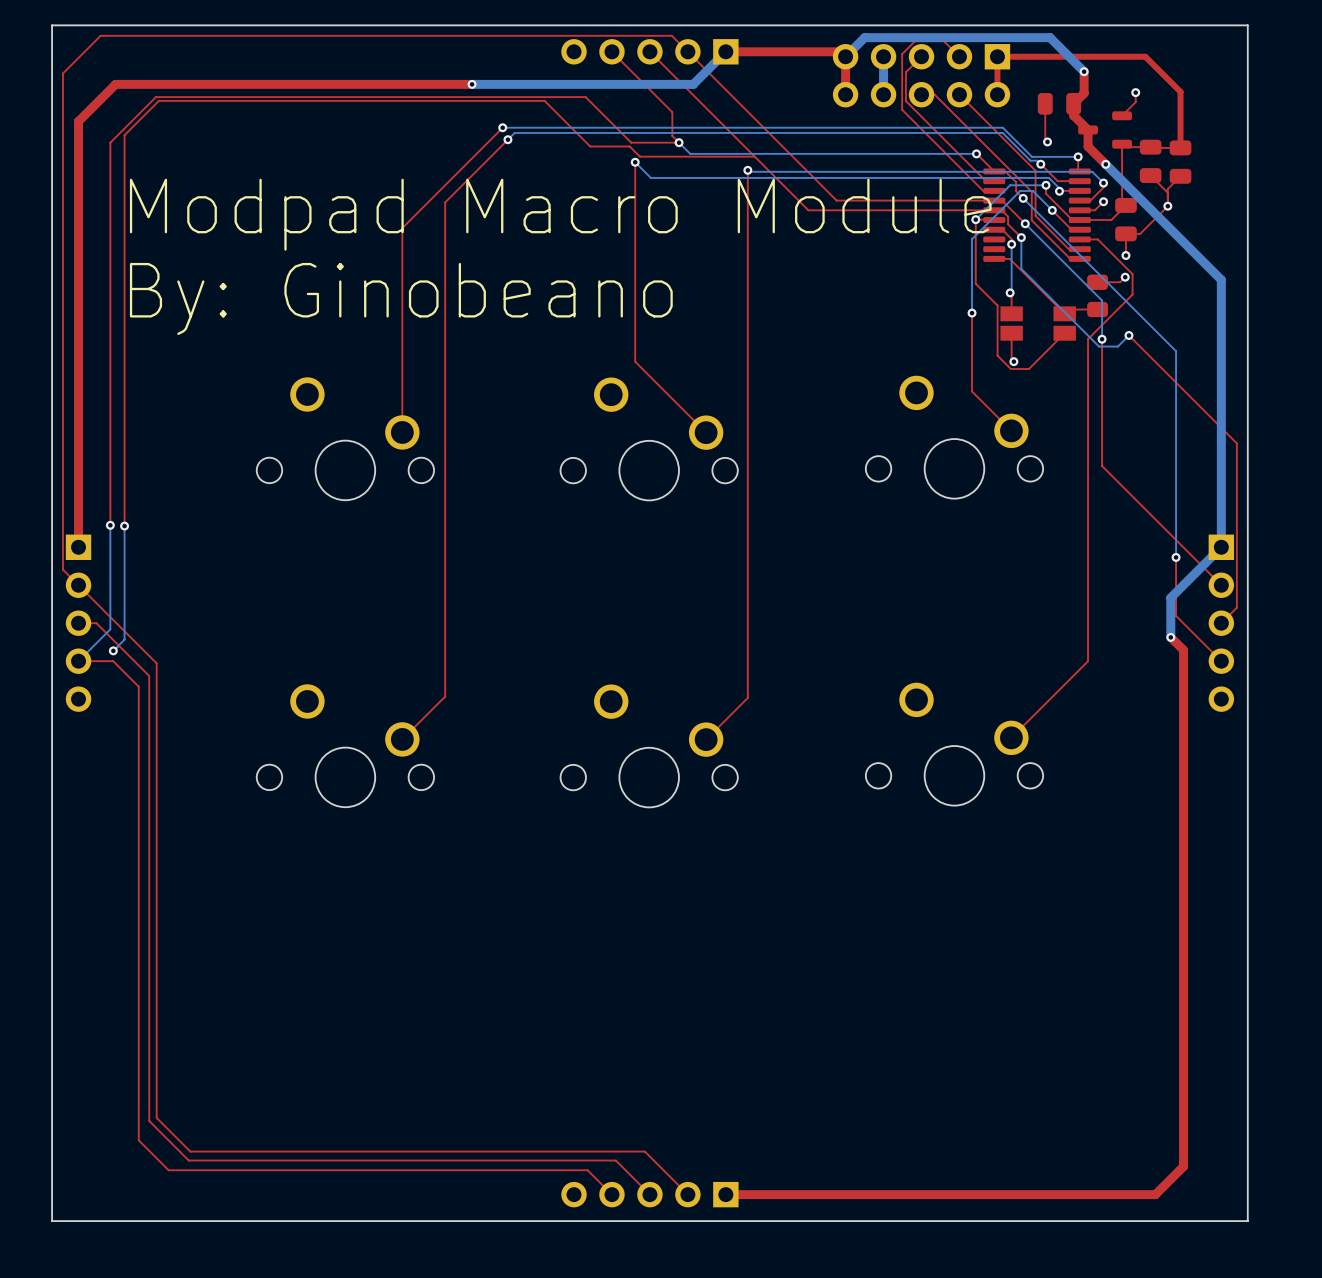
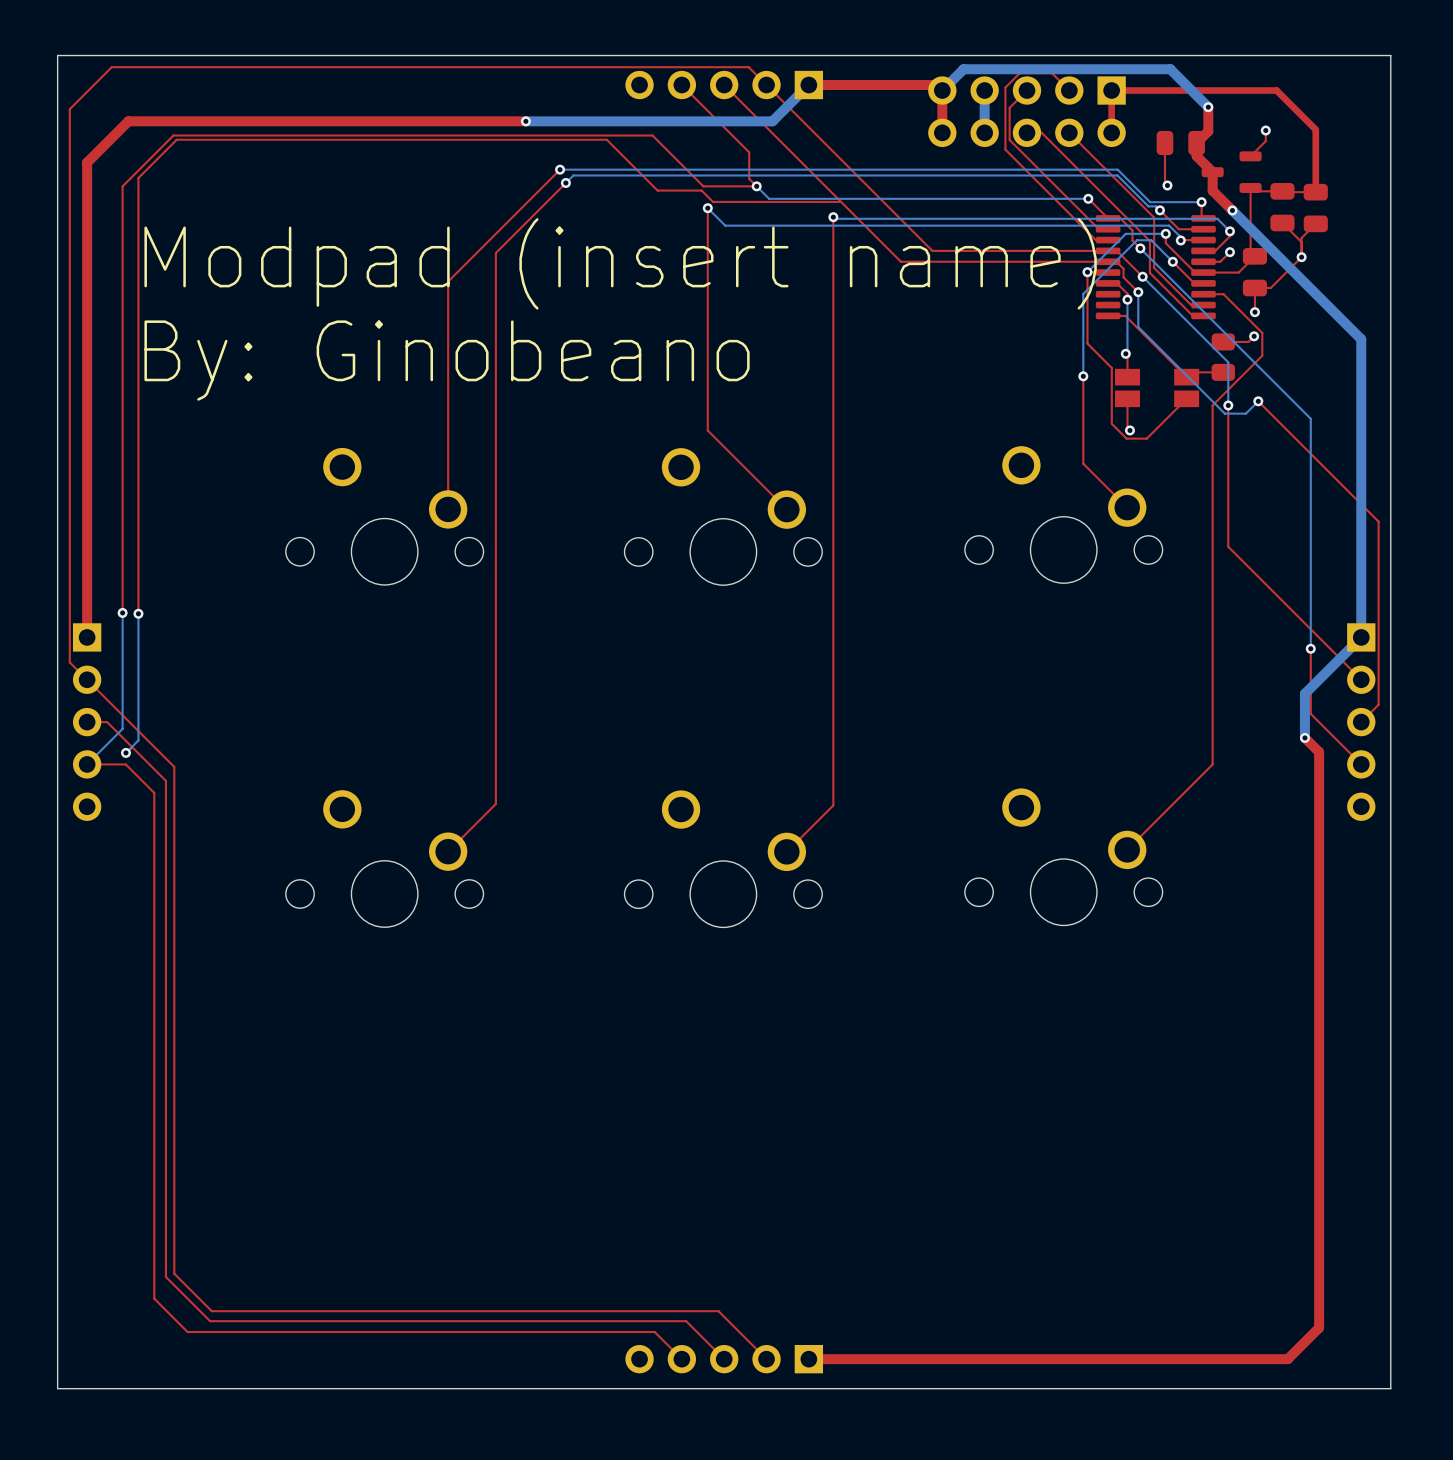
text: Modpad Macro Module (560, 214) -> Modpad (insert name) (620, 263)

